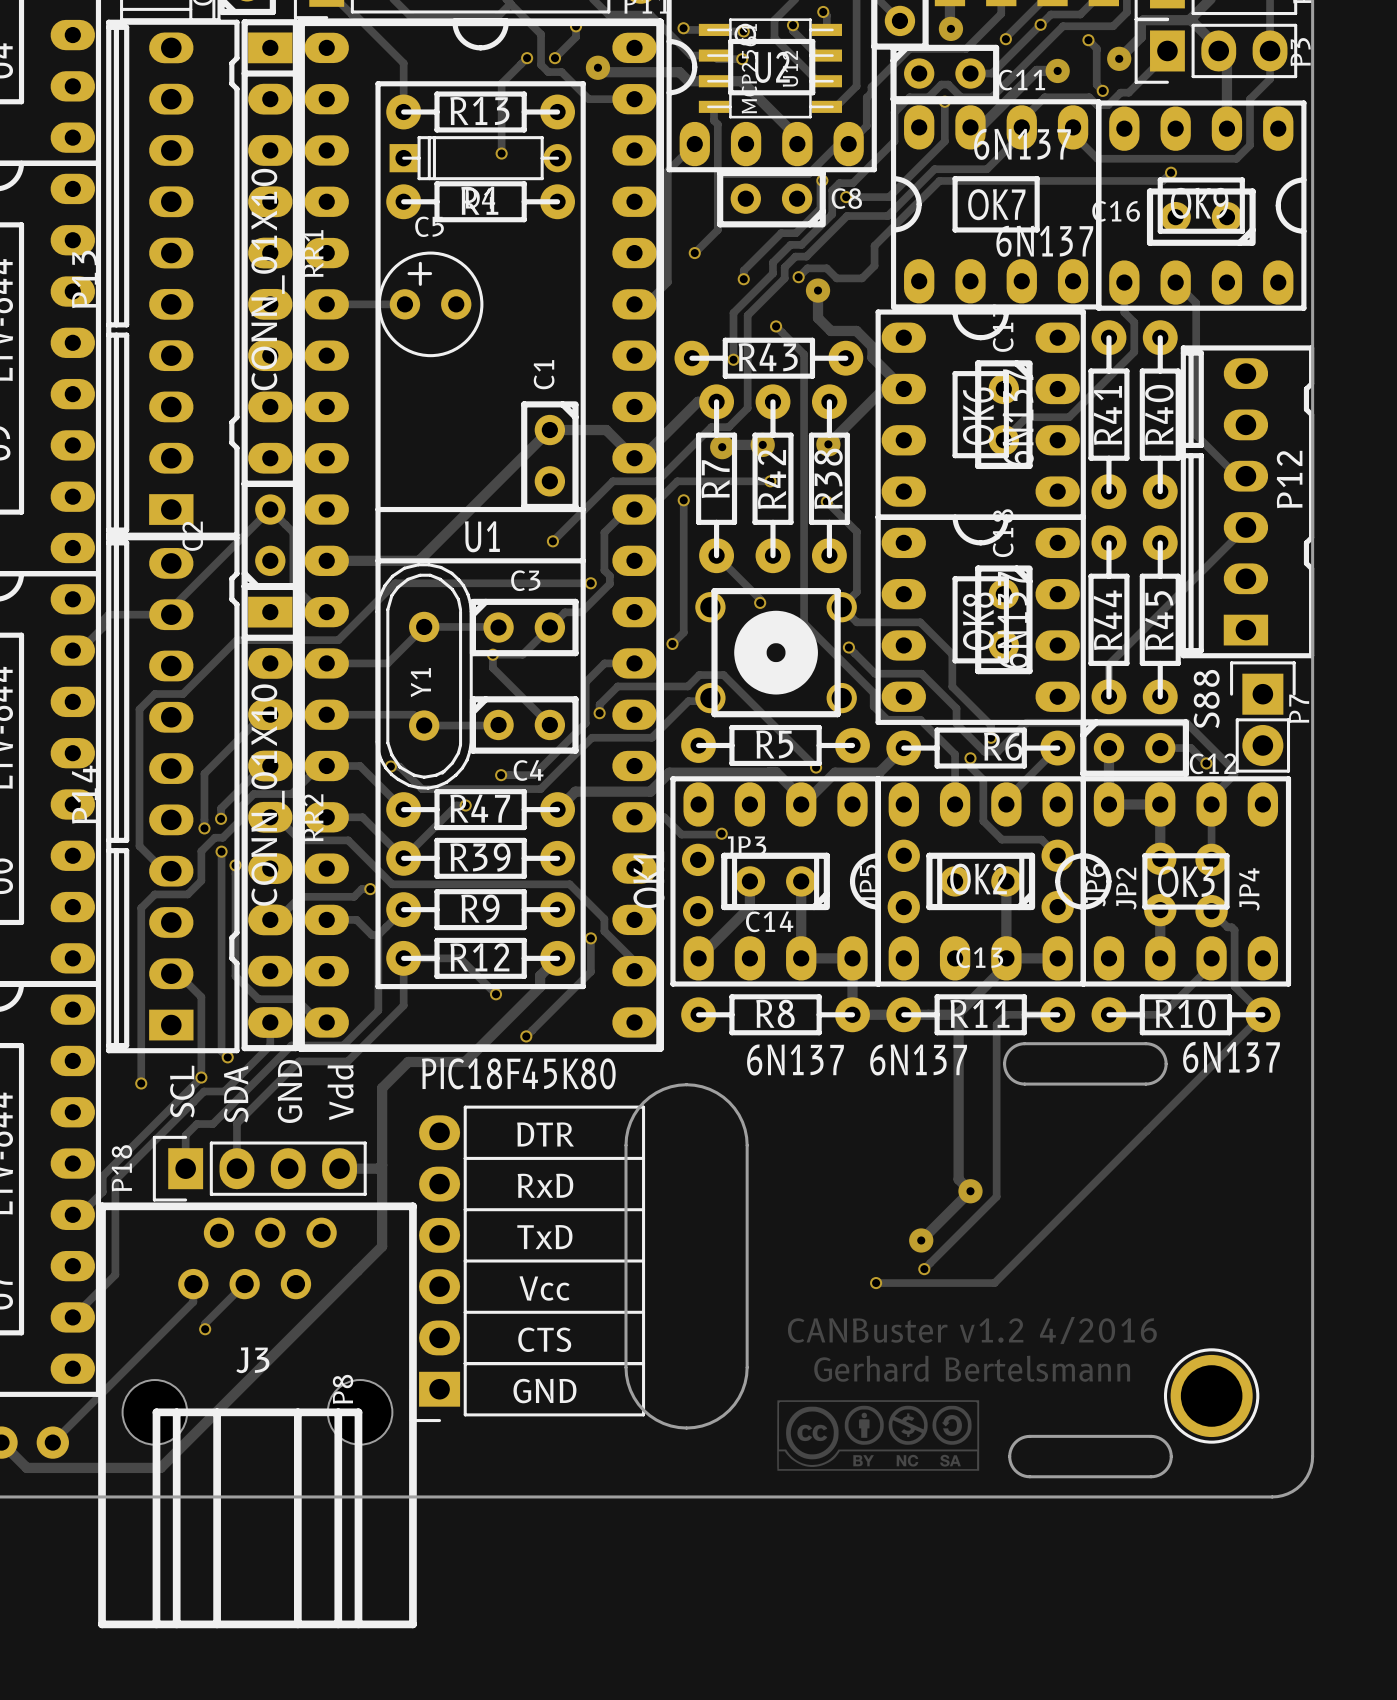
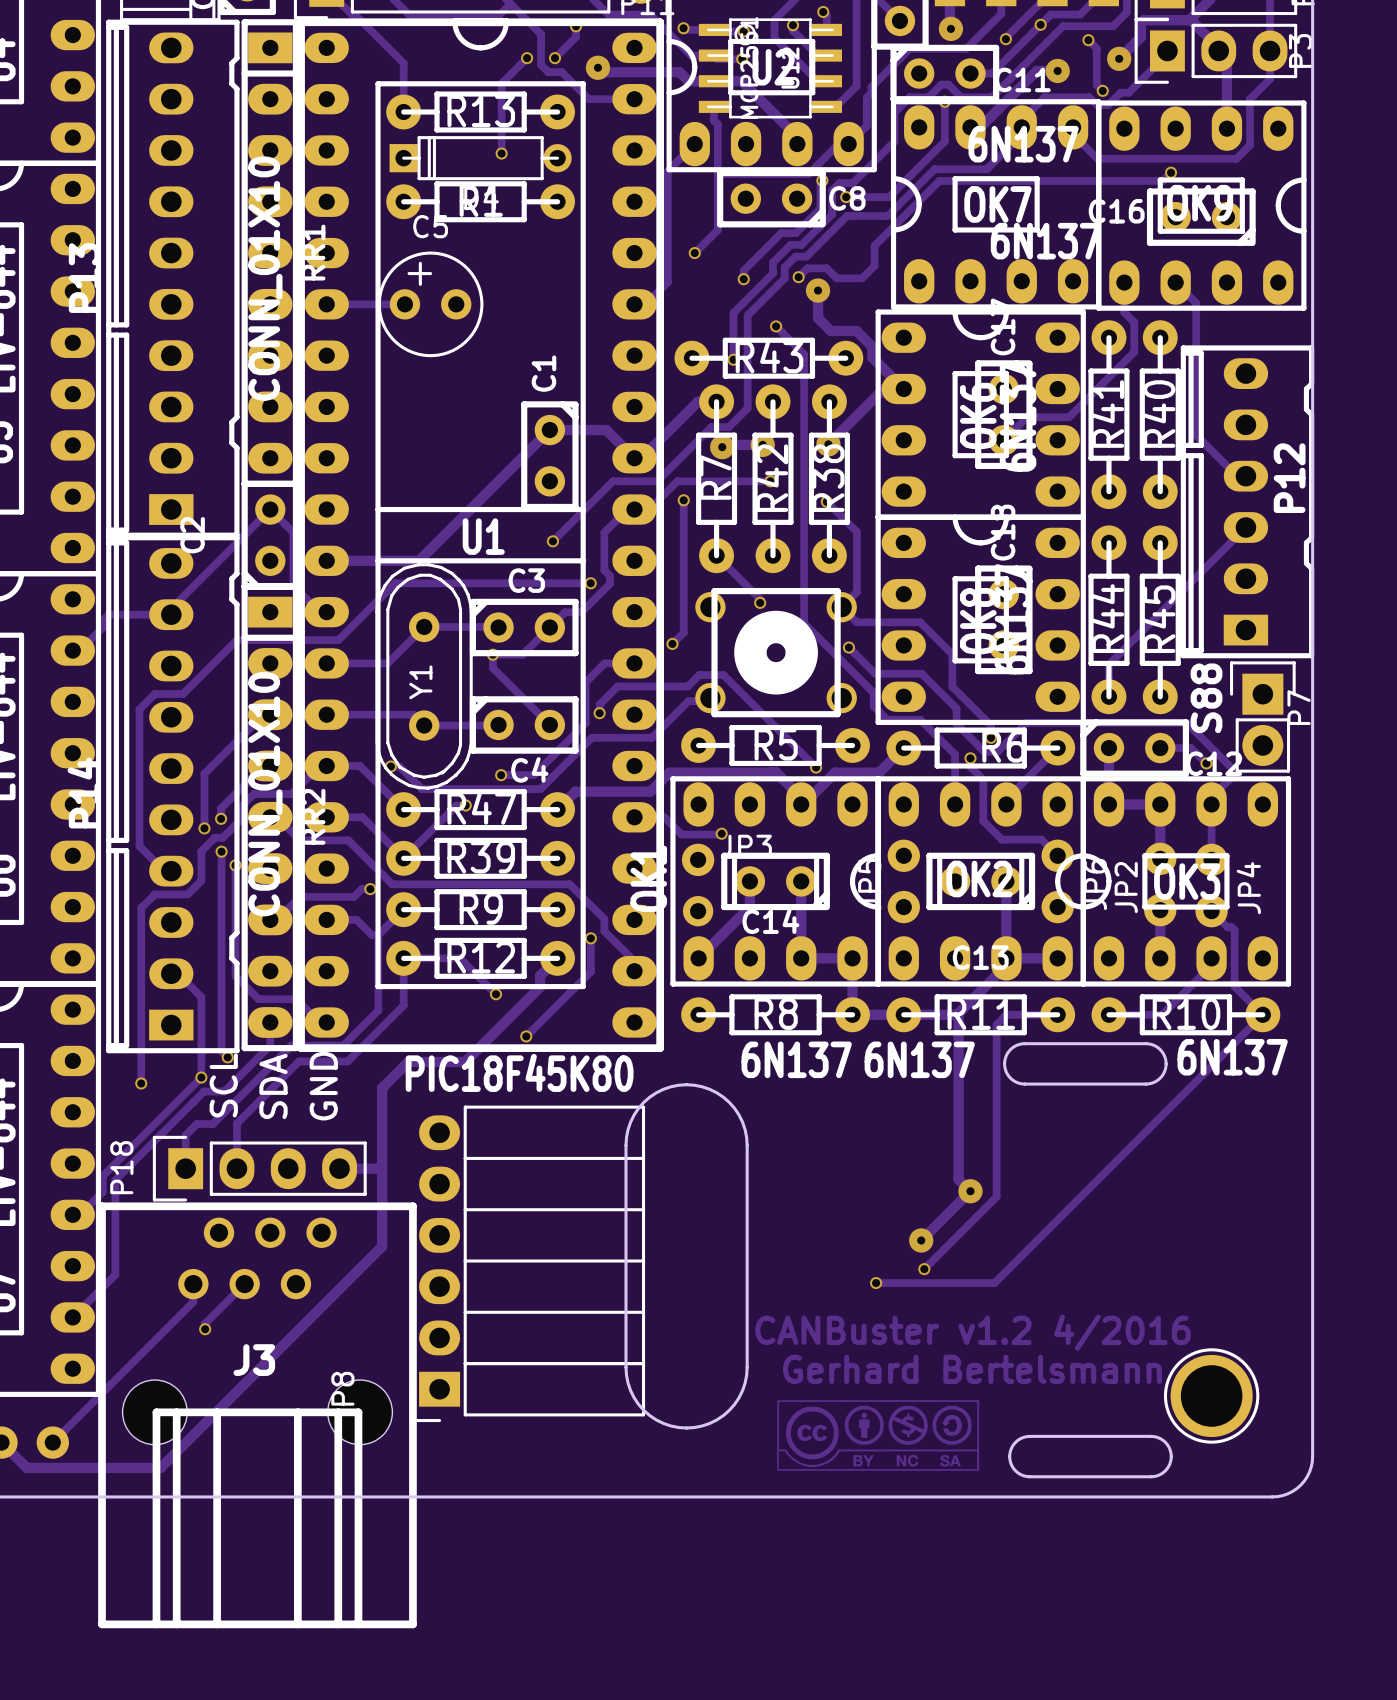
text: SCL (182, 1091) -> none
text: GND (290, 1091) -> SDA (273, 1086)
text: Vdd (340, 1092) -> none
text: SDA (236, 1094) -> SCL (223, 1085)
text: DTR (545, 1134) -> none
text: RxD (545, 1185) -> none
text: TxD (544, 1237) -> none
text: Vcc (544, 1288) -> none
text: CTS (544, 1339) -> none
text rotation: 0° (544, 1391) -> 90° counterclockwise (323, 1086)
text position: GND (544, 1391) -> GND (323, 1086)

